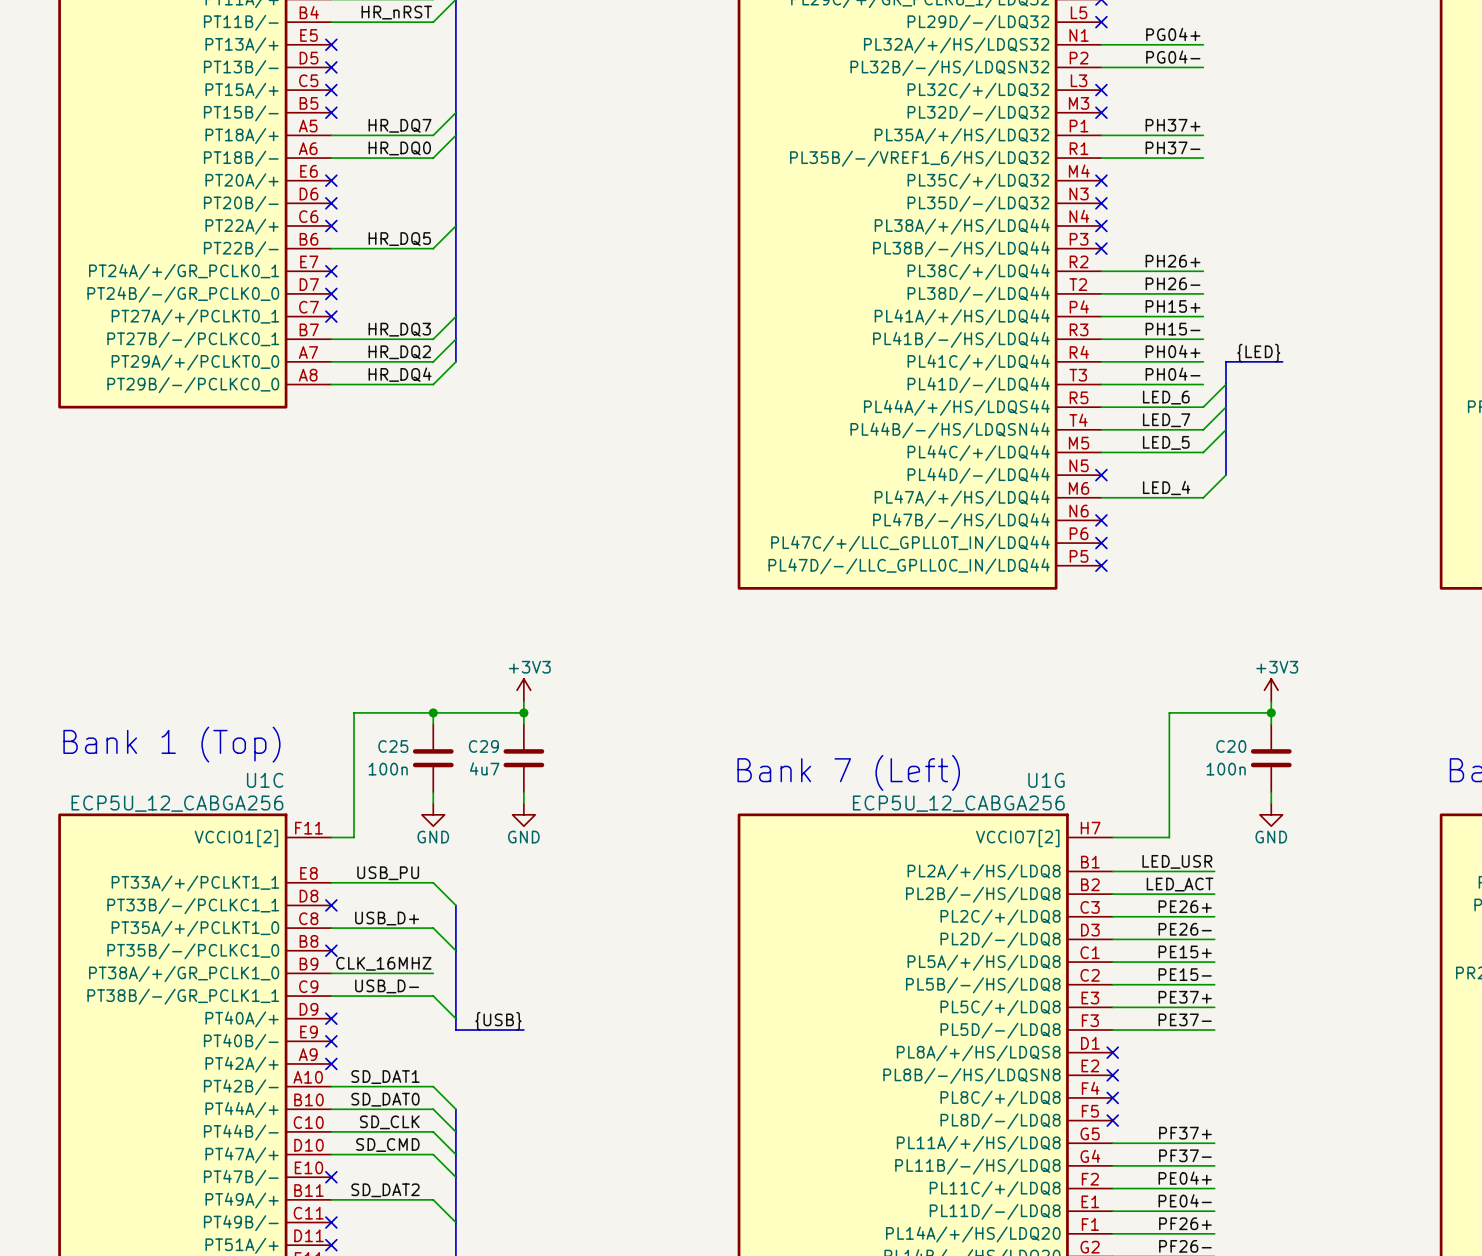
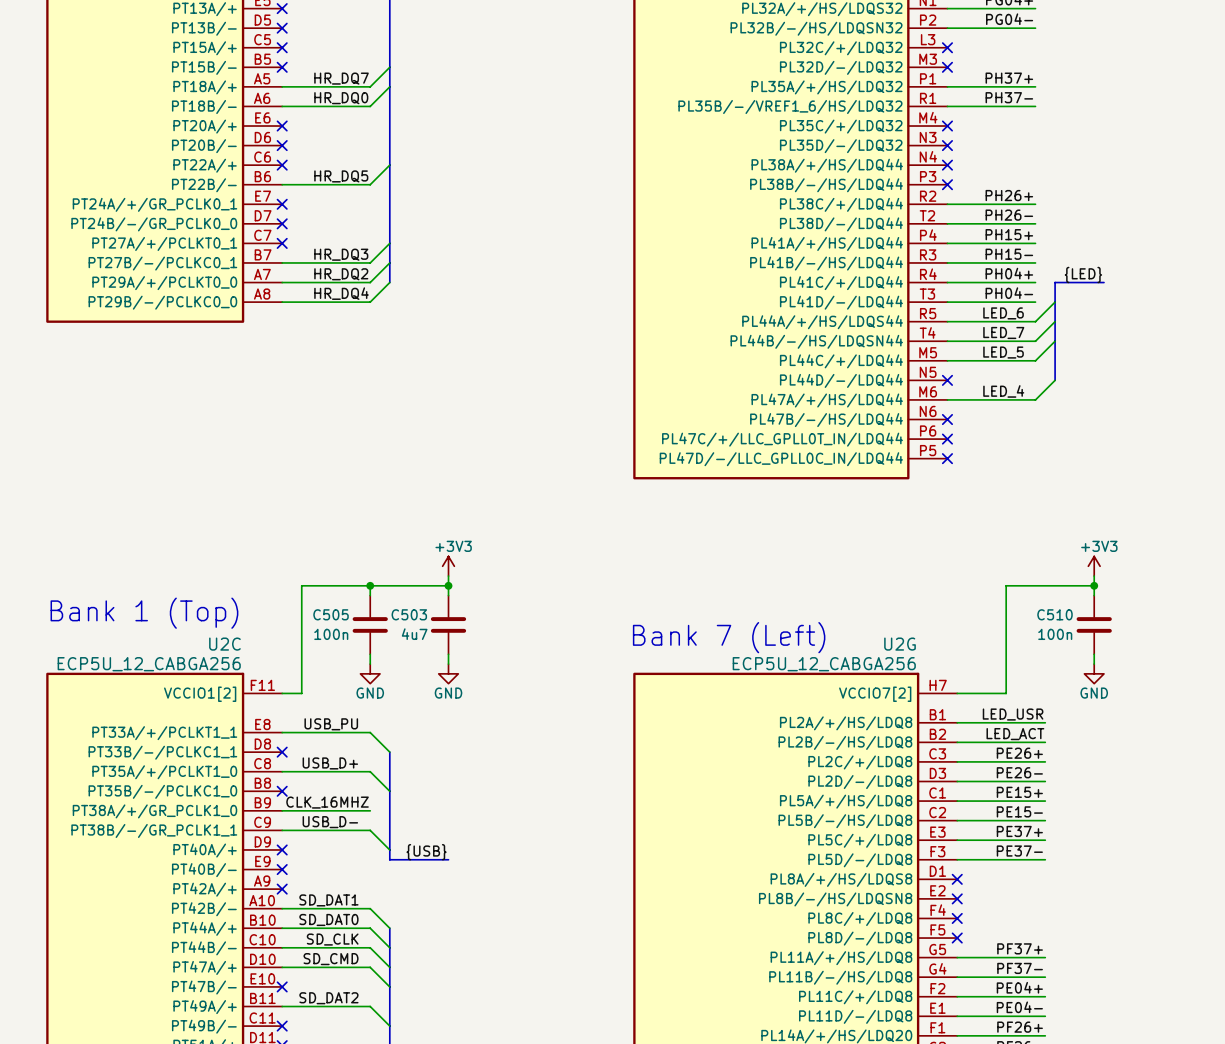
C25 name: C25 (393, 746) -> C505 (331, 614)
C29 name: C29 (483, 746) -> C503 (409, 614)
C20 name: C20 (1231, 746) -> C510 (1055, 614)
U1C name: U1C (265, 780) -> U2C (224, 644)
U1G name: U1G (1046, 780) -> U2G (900, 644)

